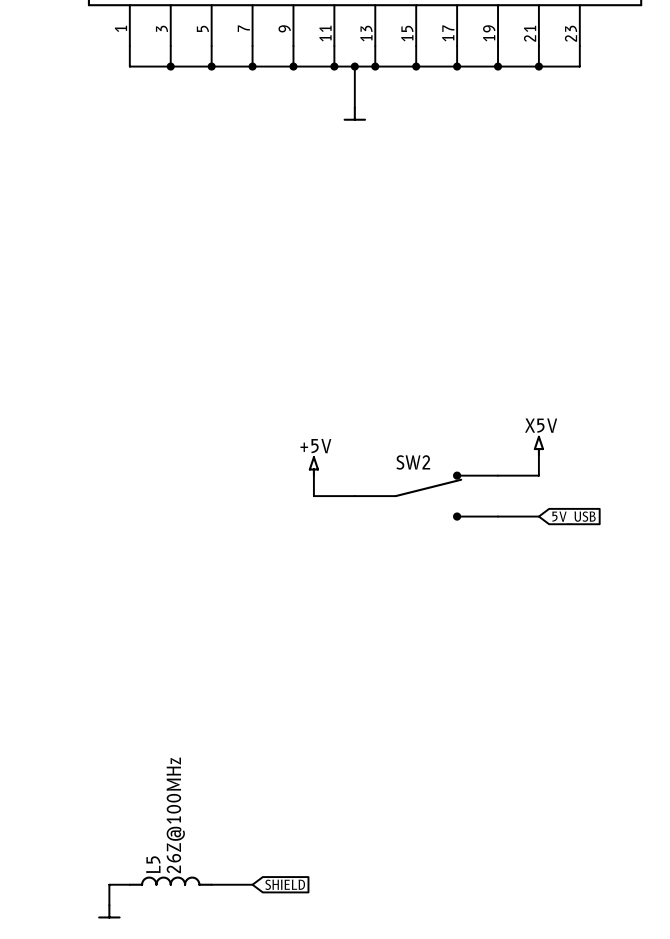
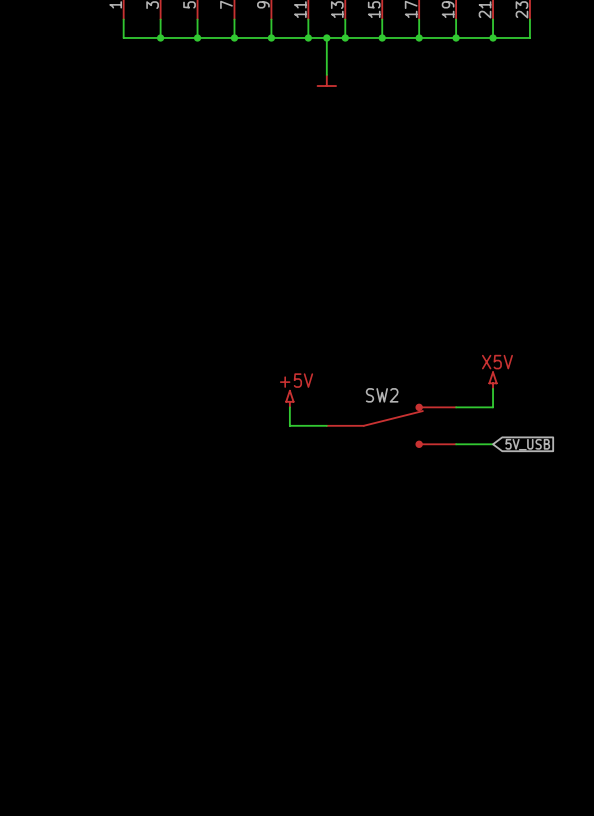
L5: 26Z@100MHz (170, 881) -> none
wire: (129, 884) (109, 884) (109, 905) -> none
wire: (211, 884) (252, 884) -> none
global label: SHIELD (285, 884) -> none
power symbol: (109, 911) -> none

